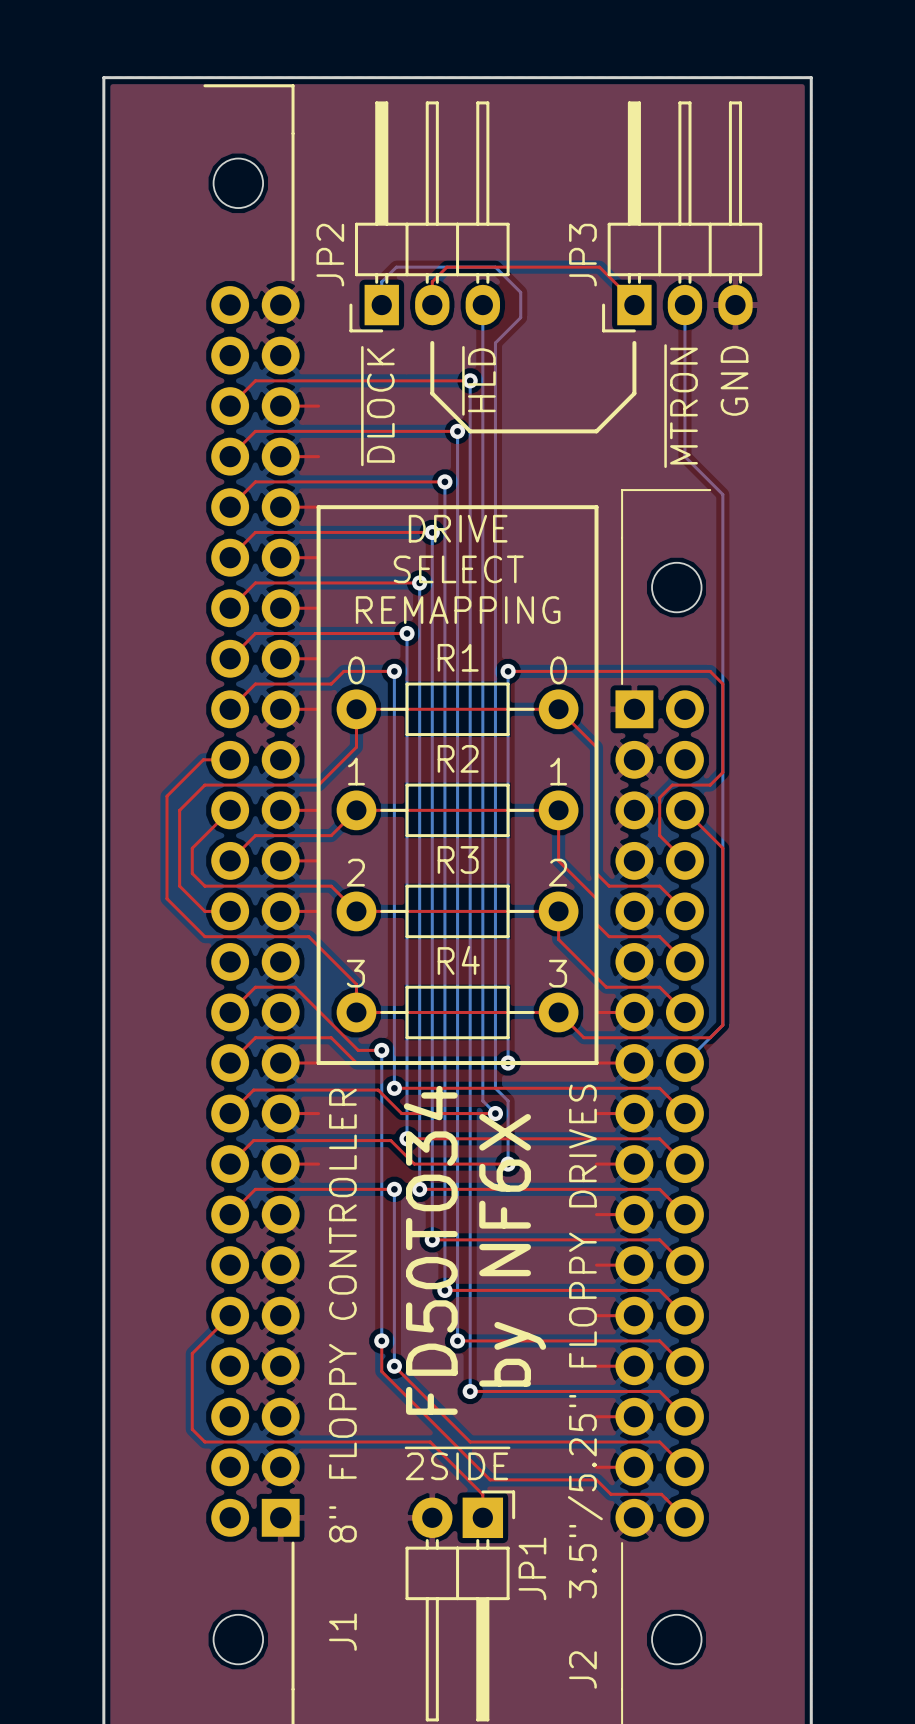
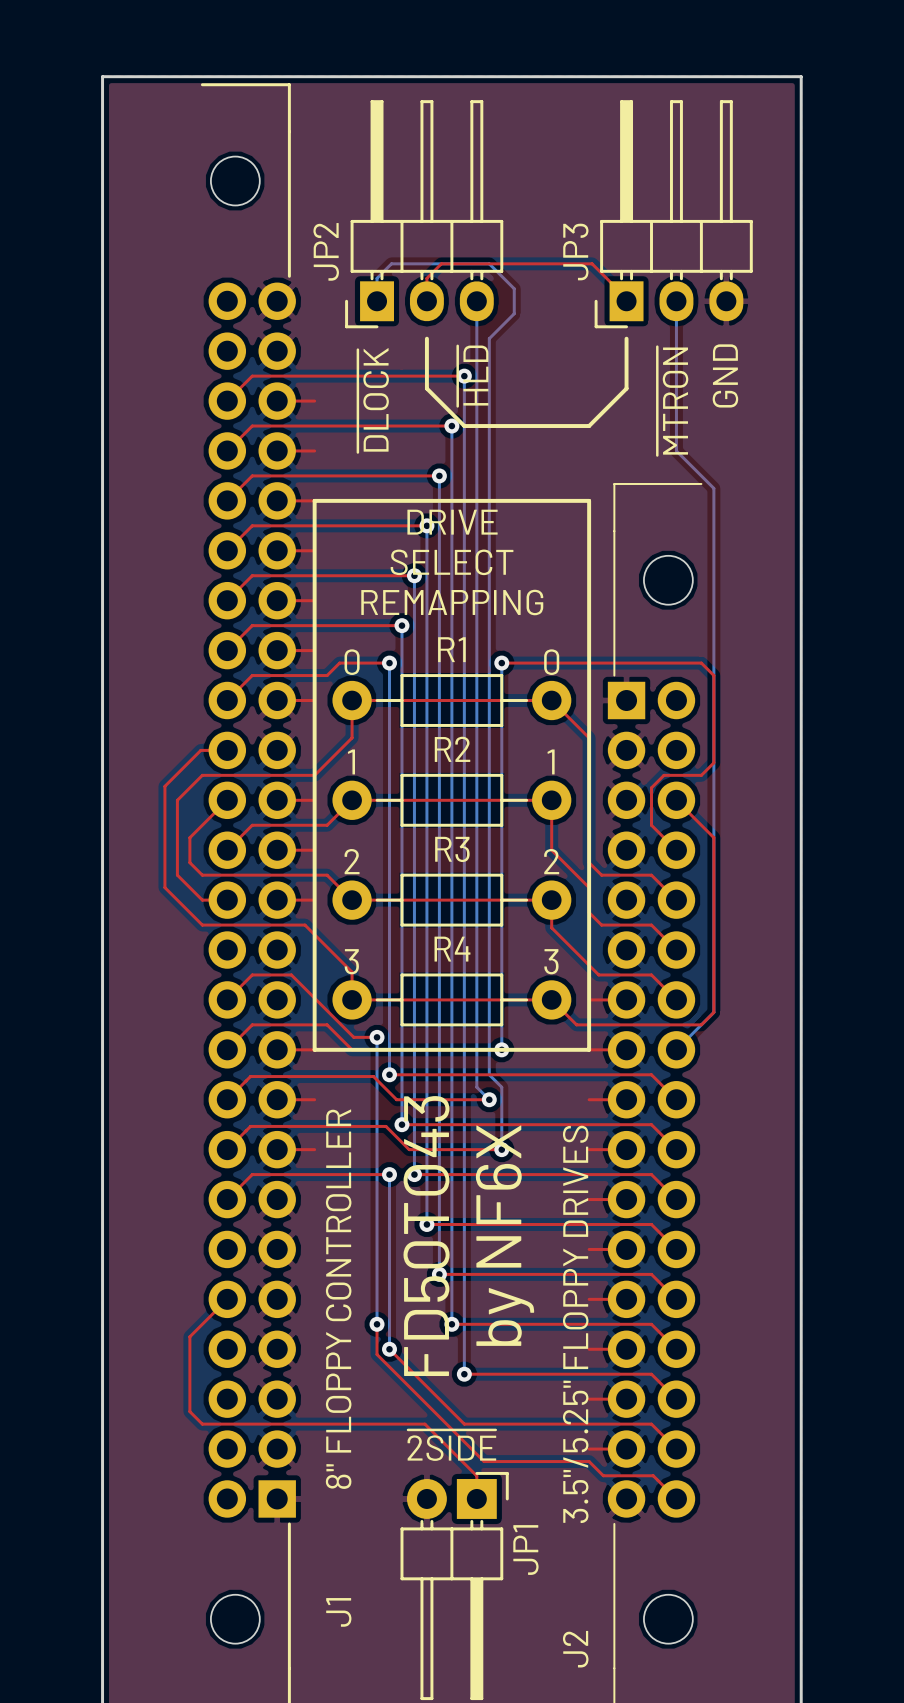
text: FD50TO34 (430, 1250) -> FD50TO43 (426, 1236)

